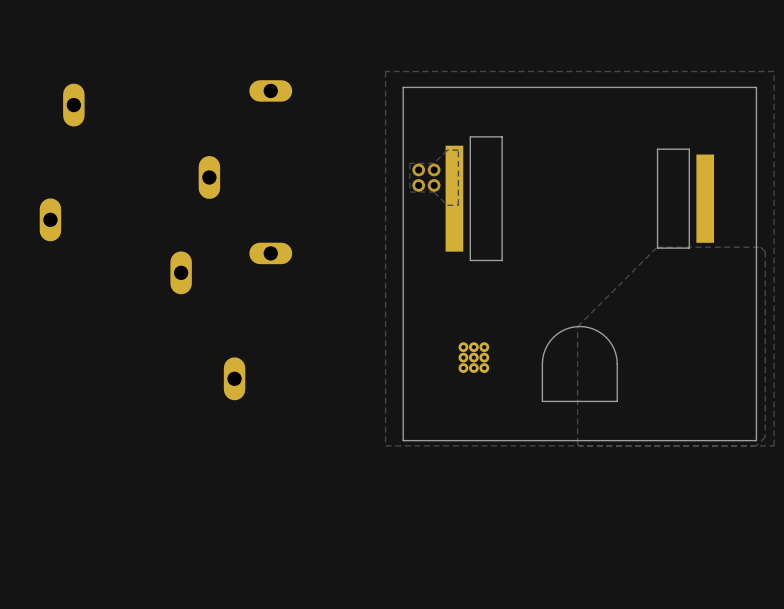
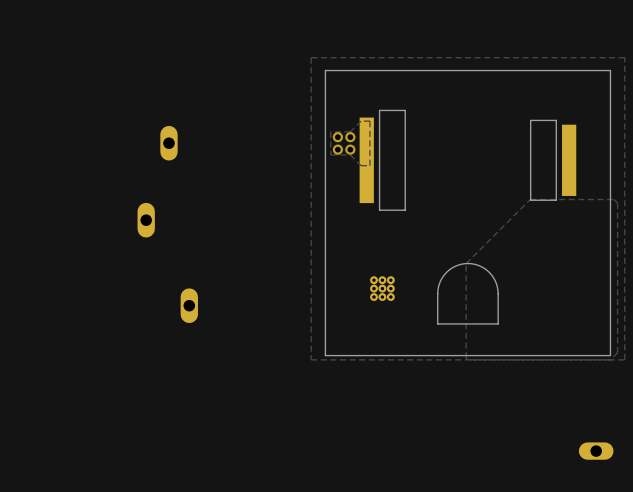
part: (270, 90) -> none
part: (73, 105) -> none
part: (50, 219) -> none
part: (270, 253) -> none
part: none -> (596, 451)

